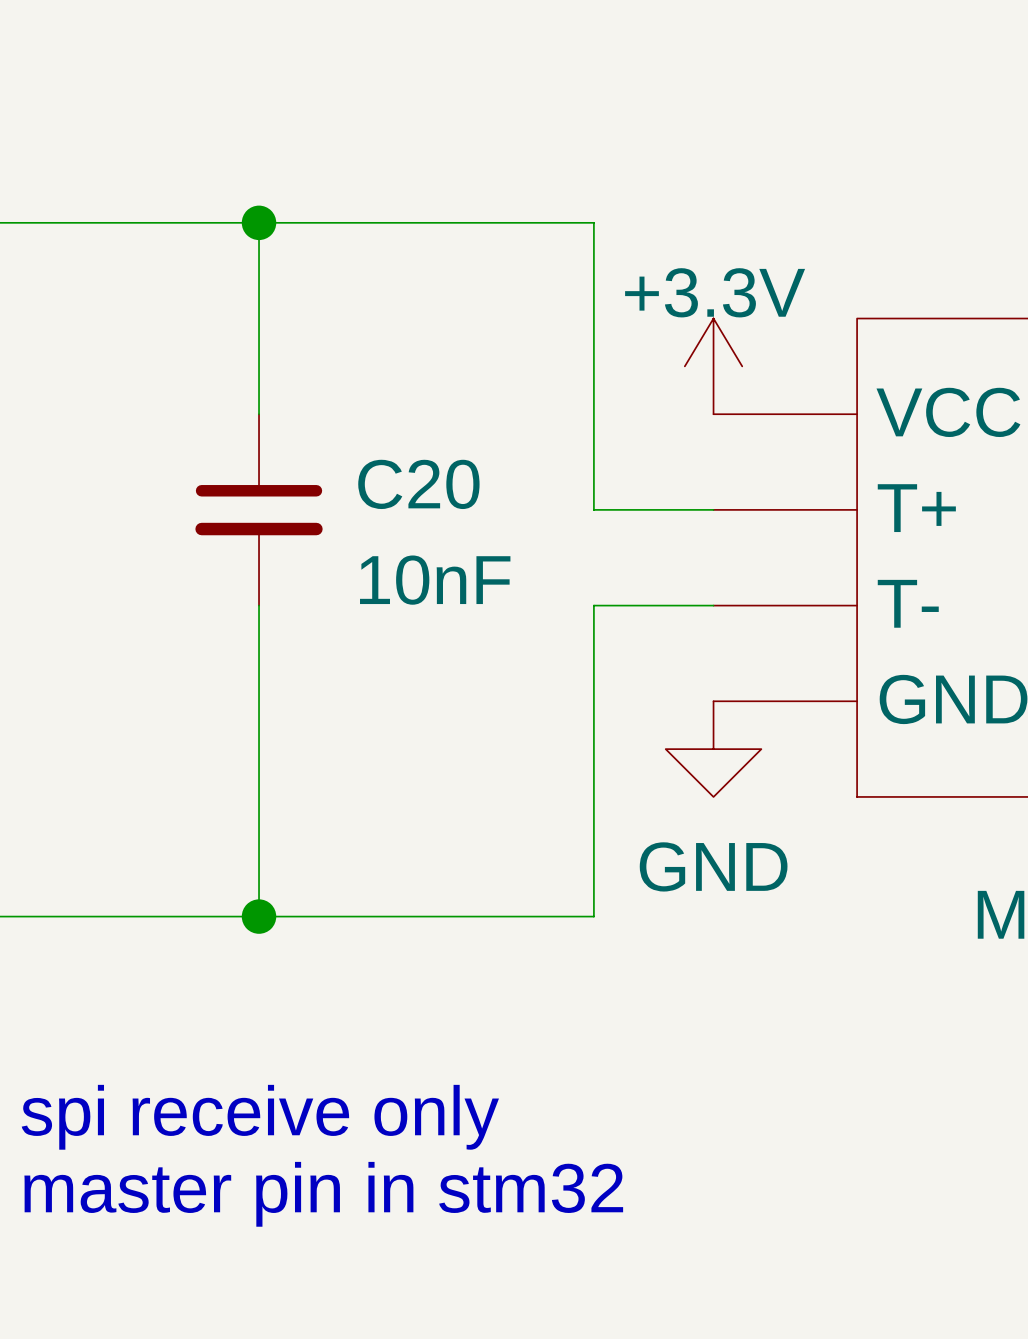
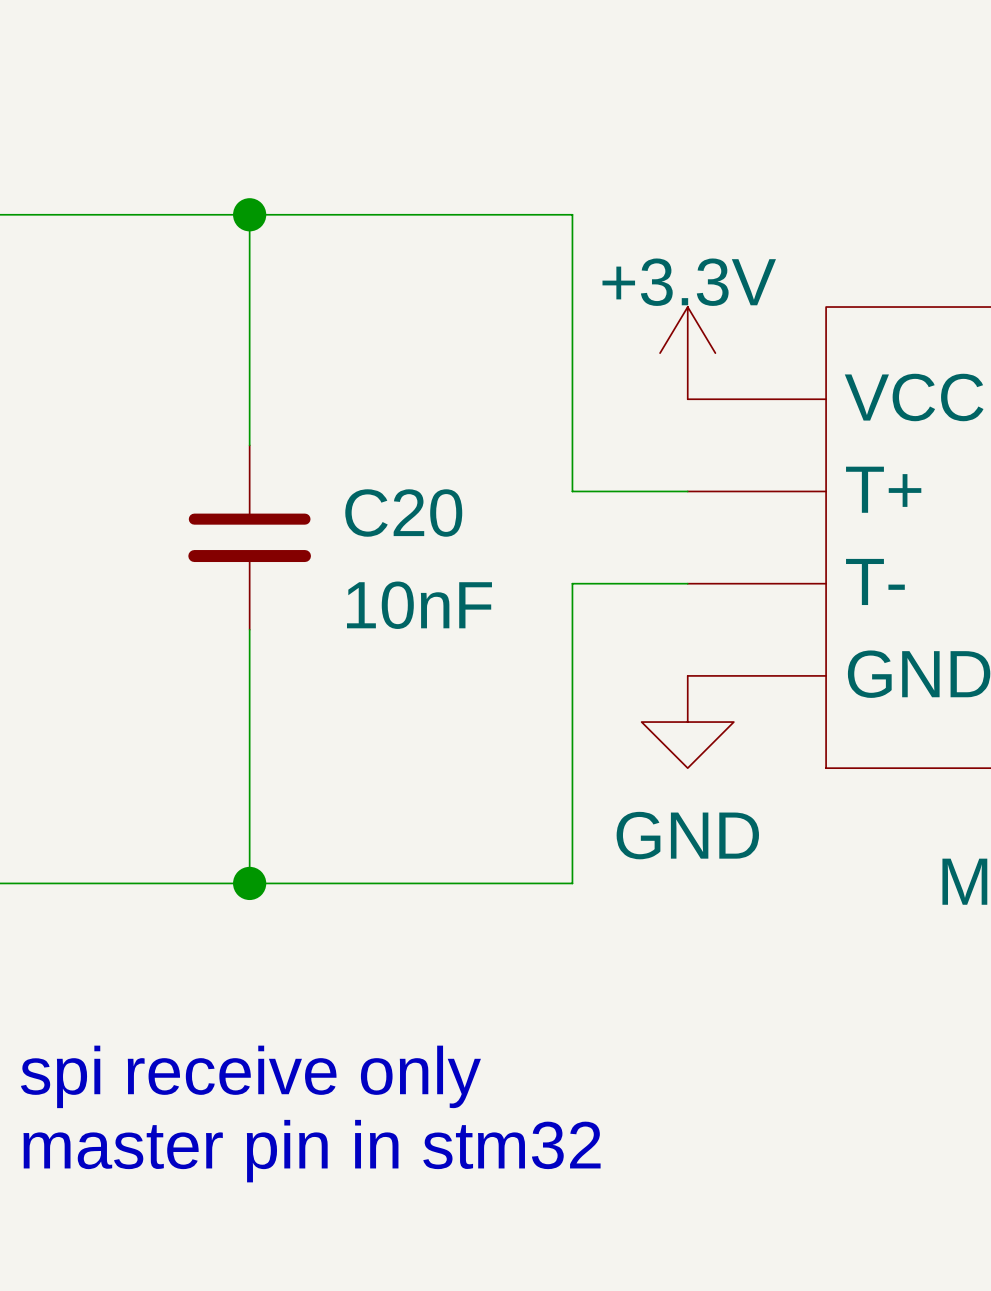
C20 position: (259, 509) -> (249, 537)

